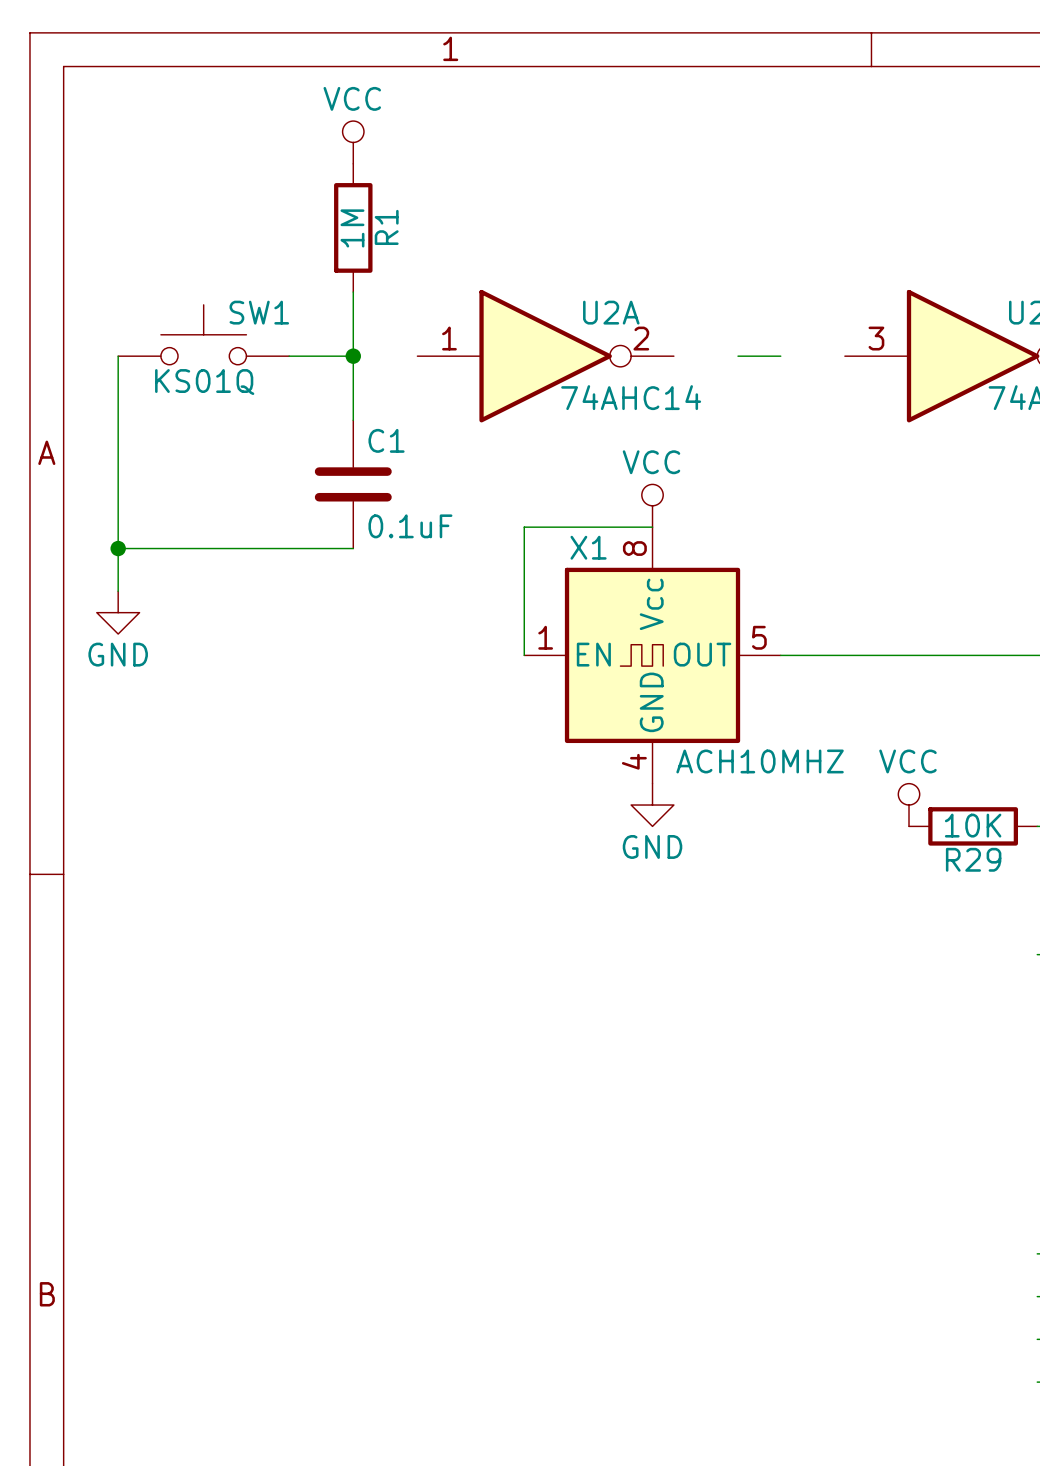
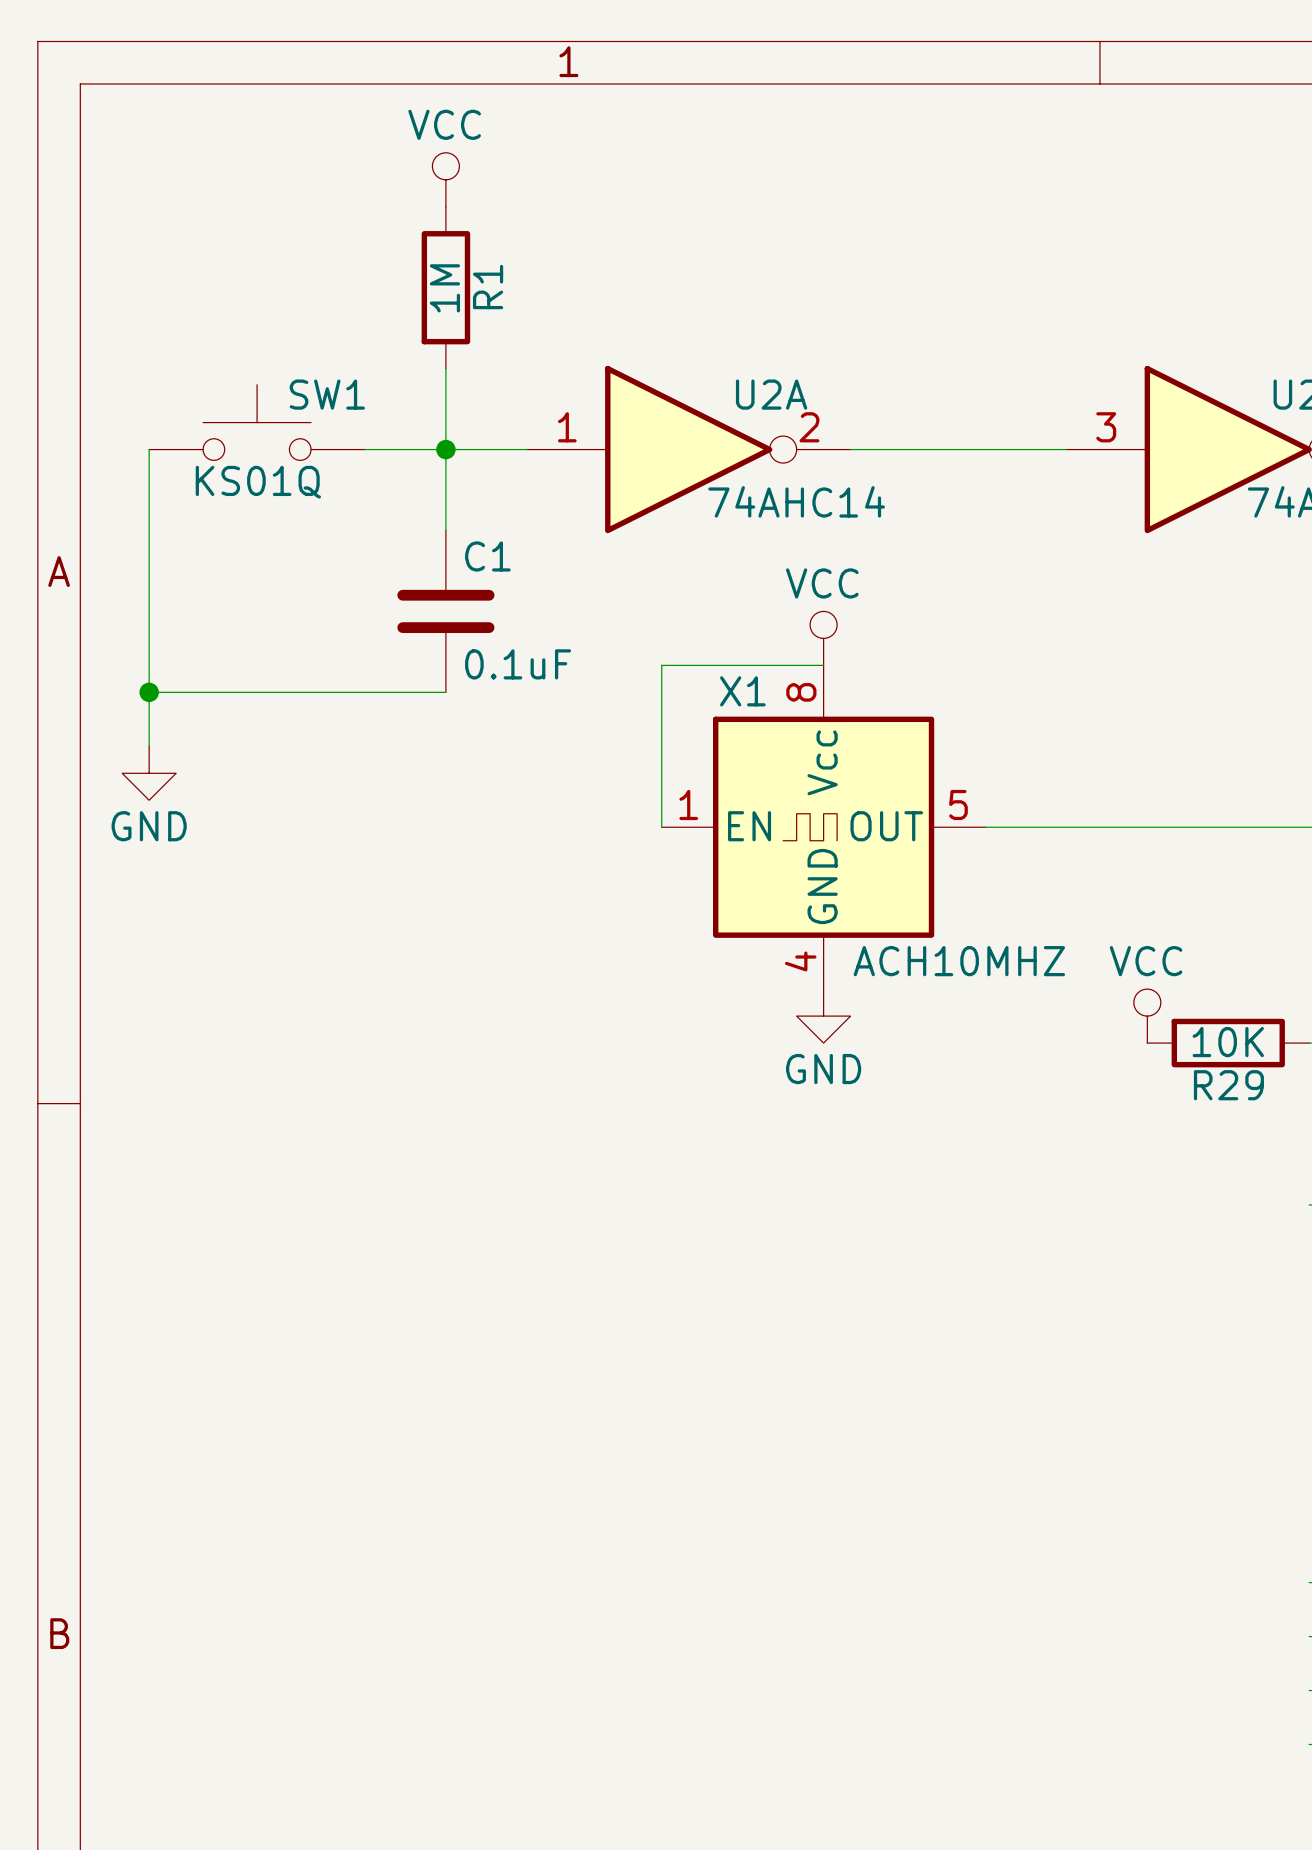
wire: none -> (445, 449) (526, 449)
wire: none -> (850, 449) (931, 449)
wire: none -> (985, 449) (1066, 449)

